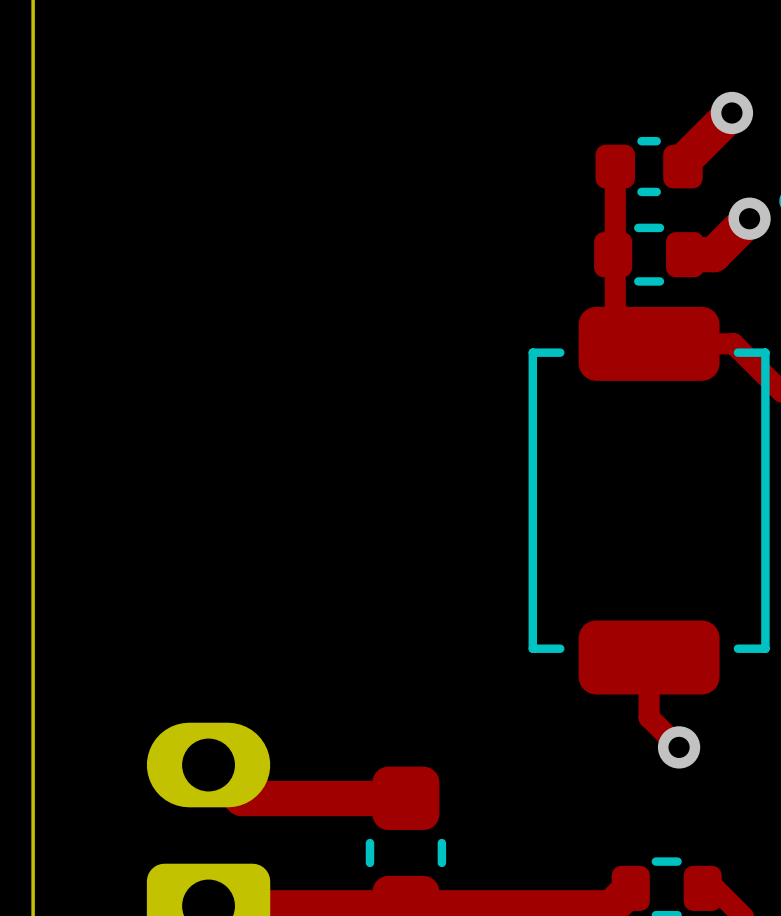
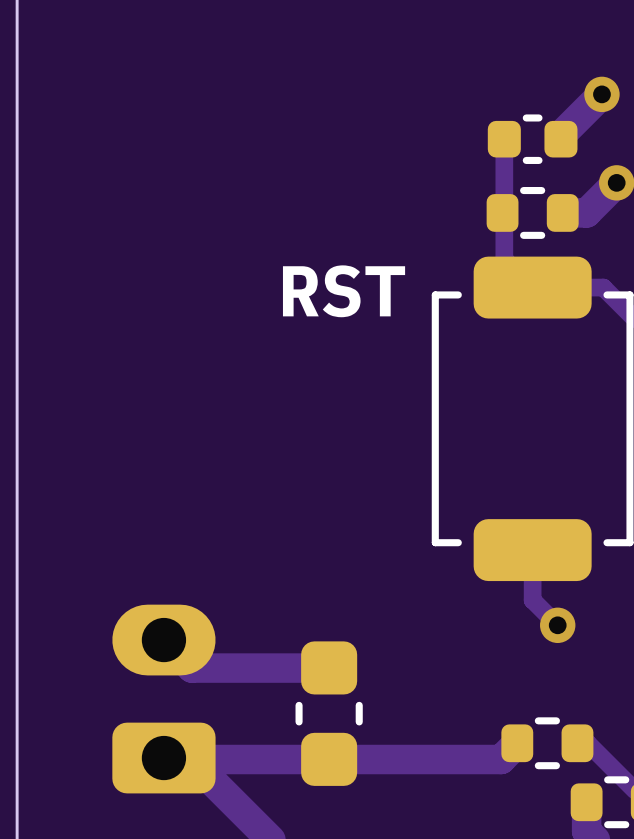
text: none -> RST (344, 291)

